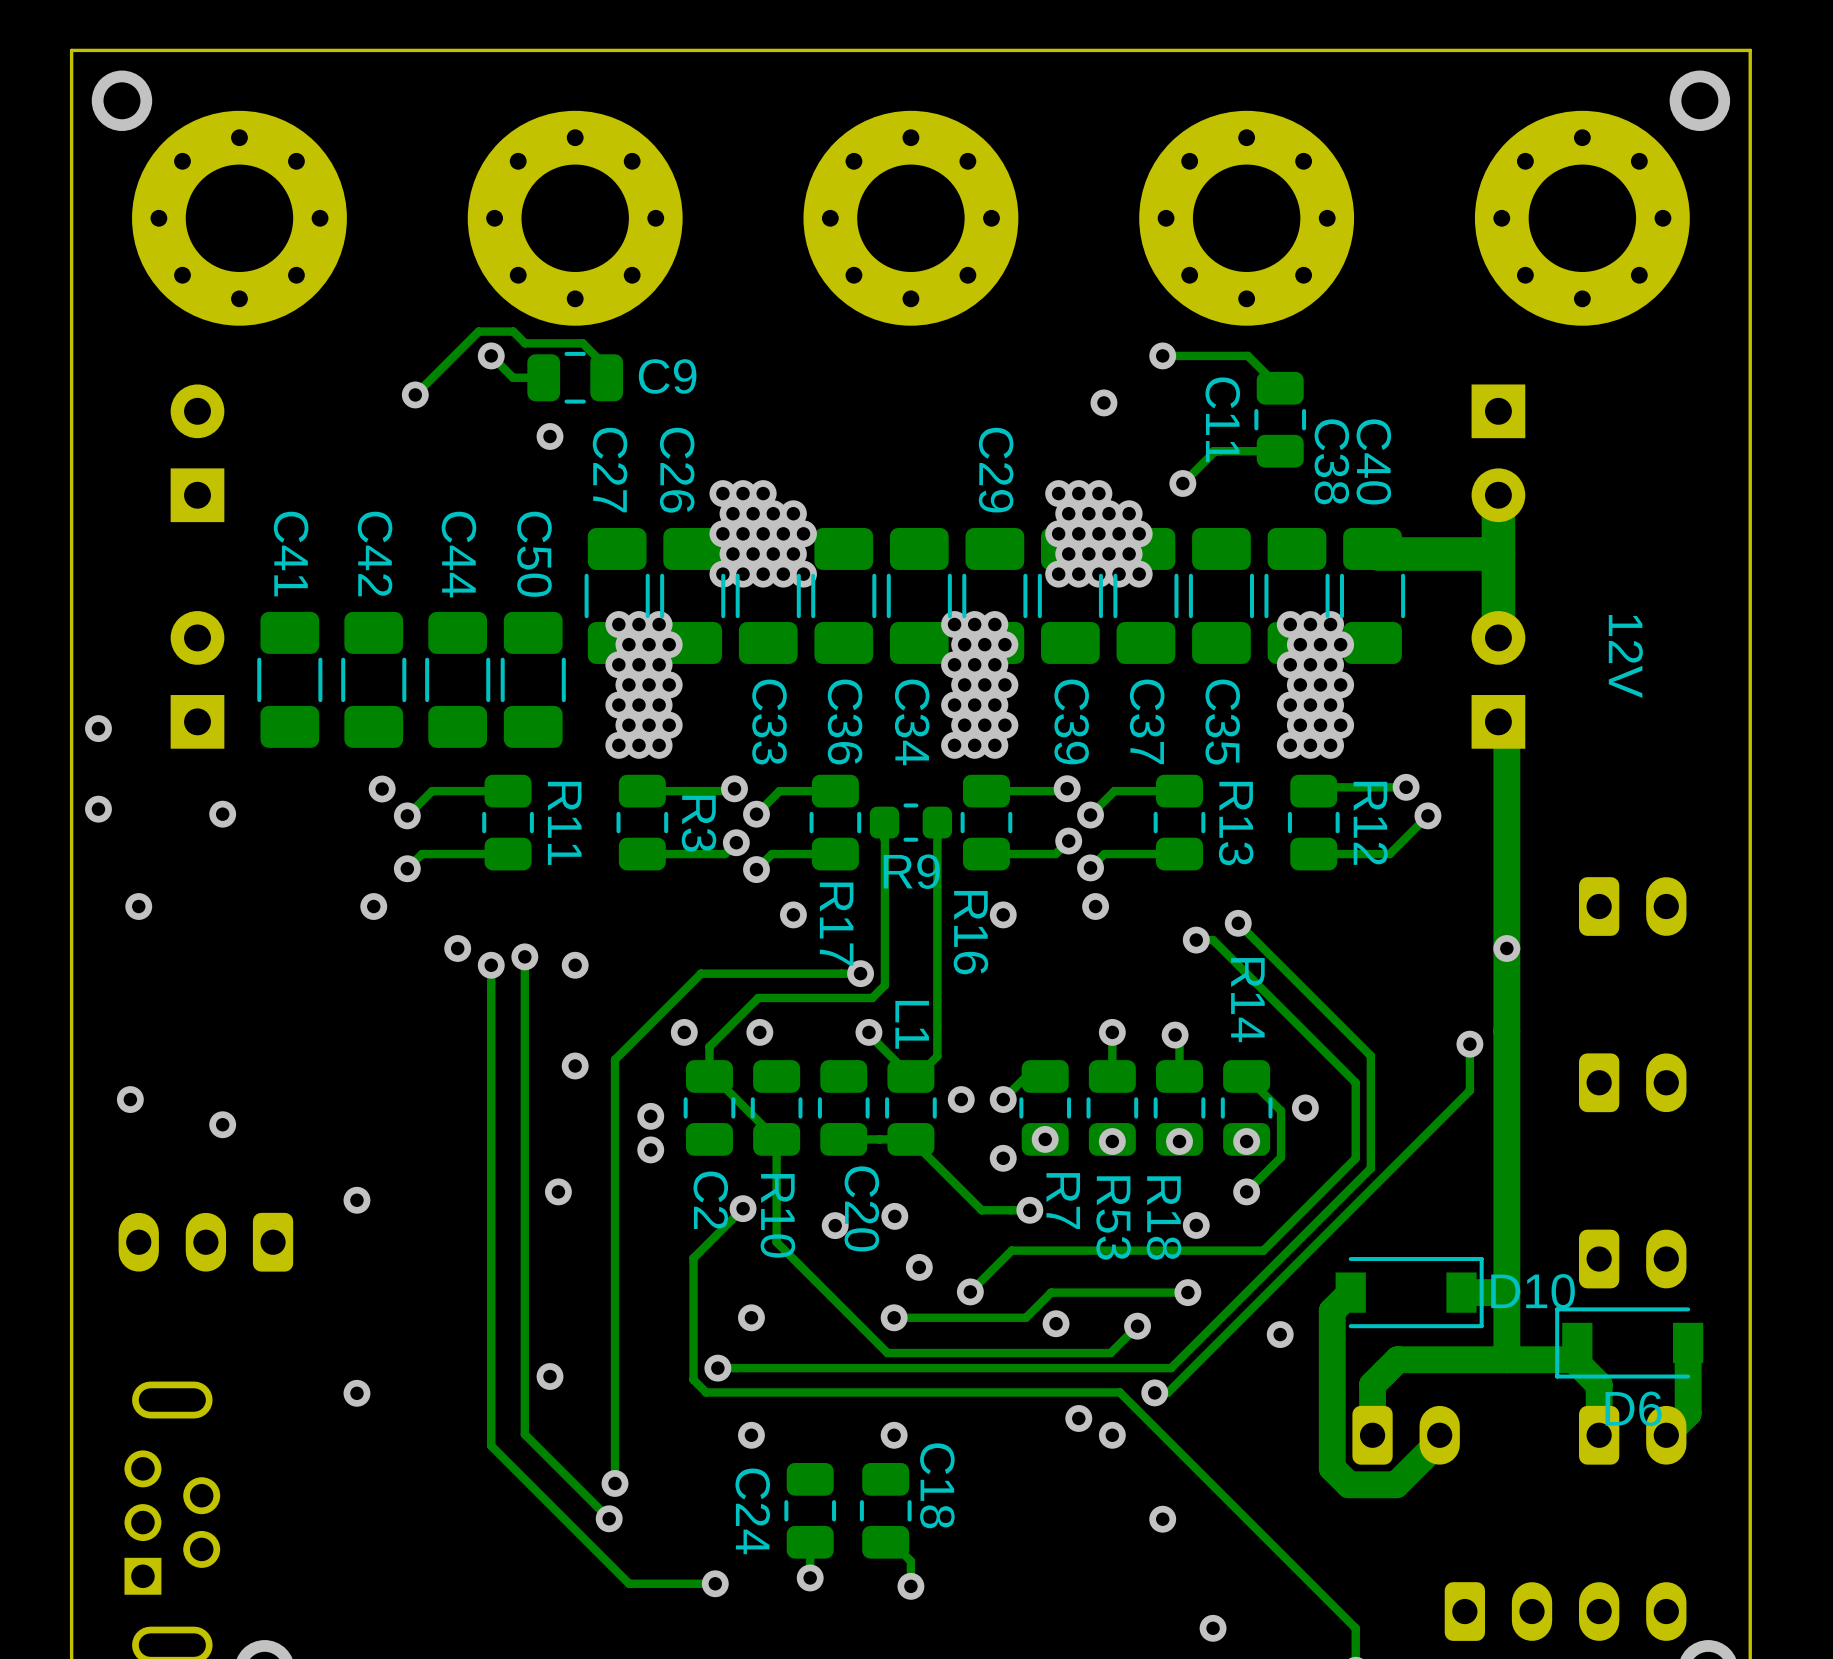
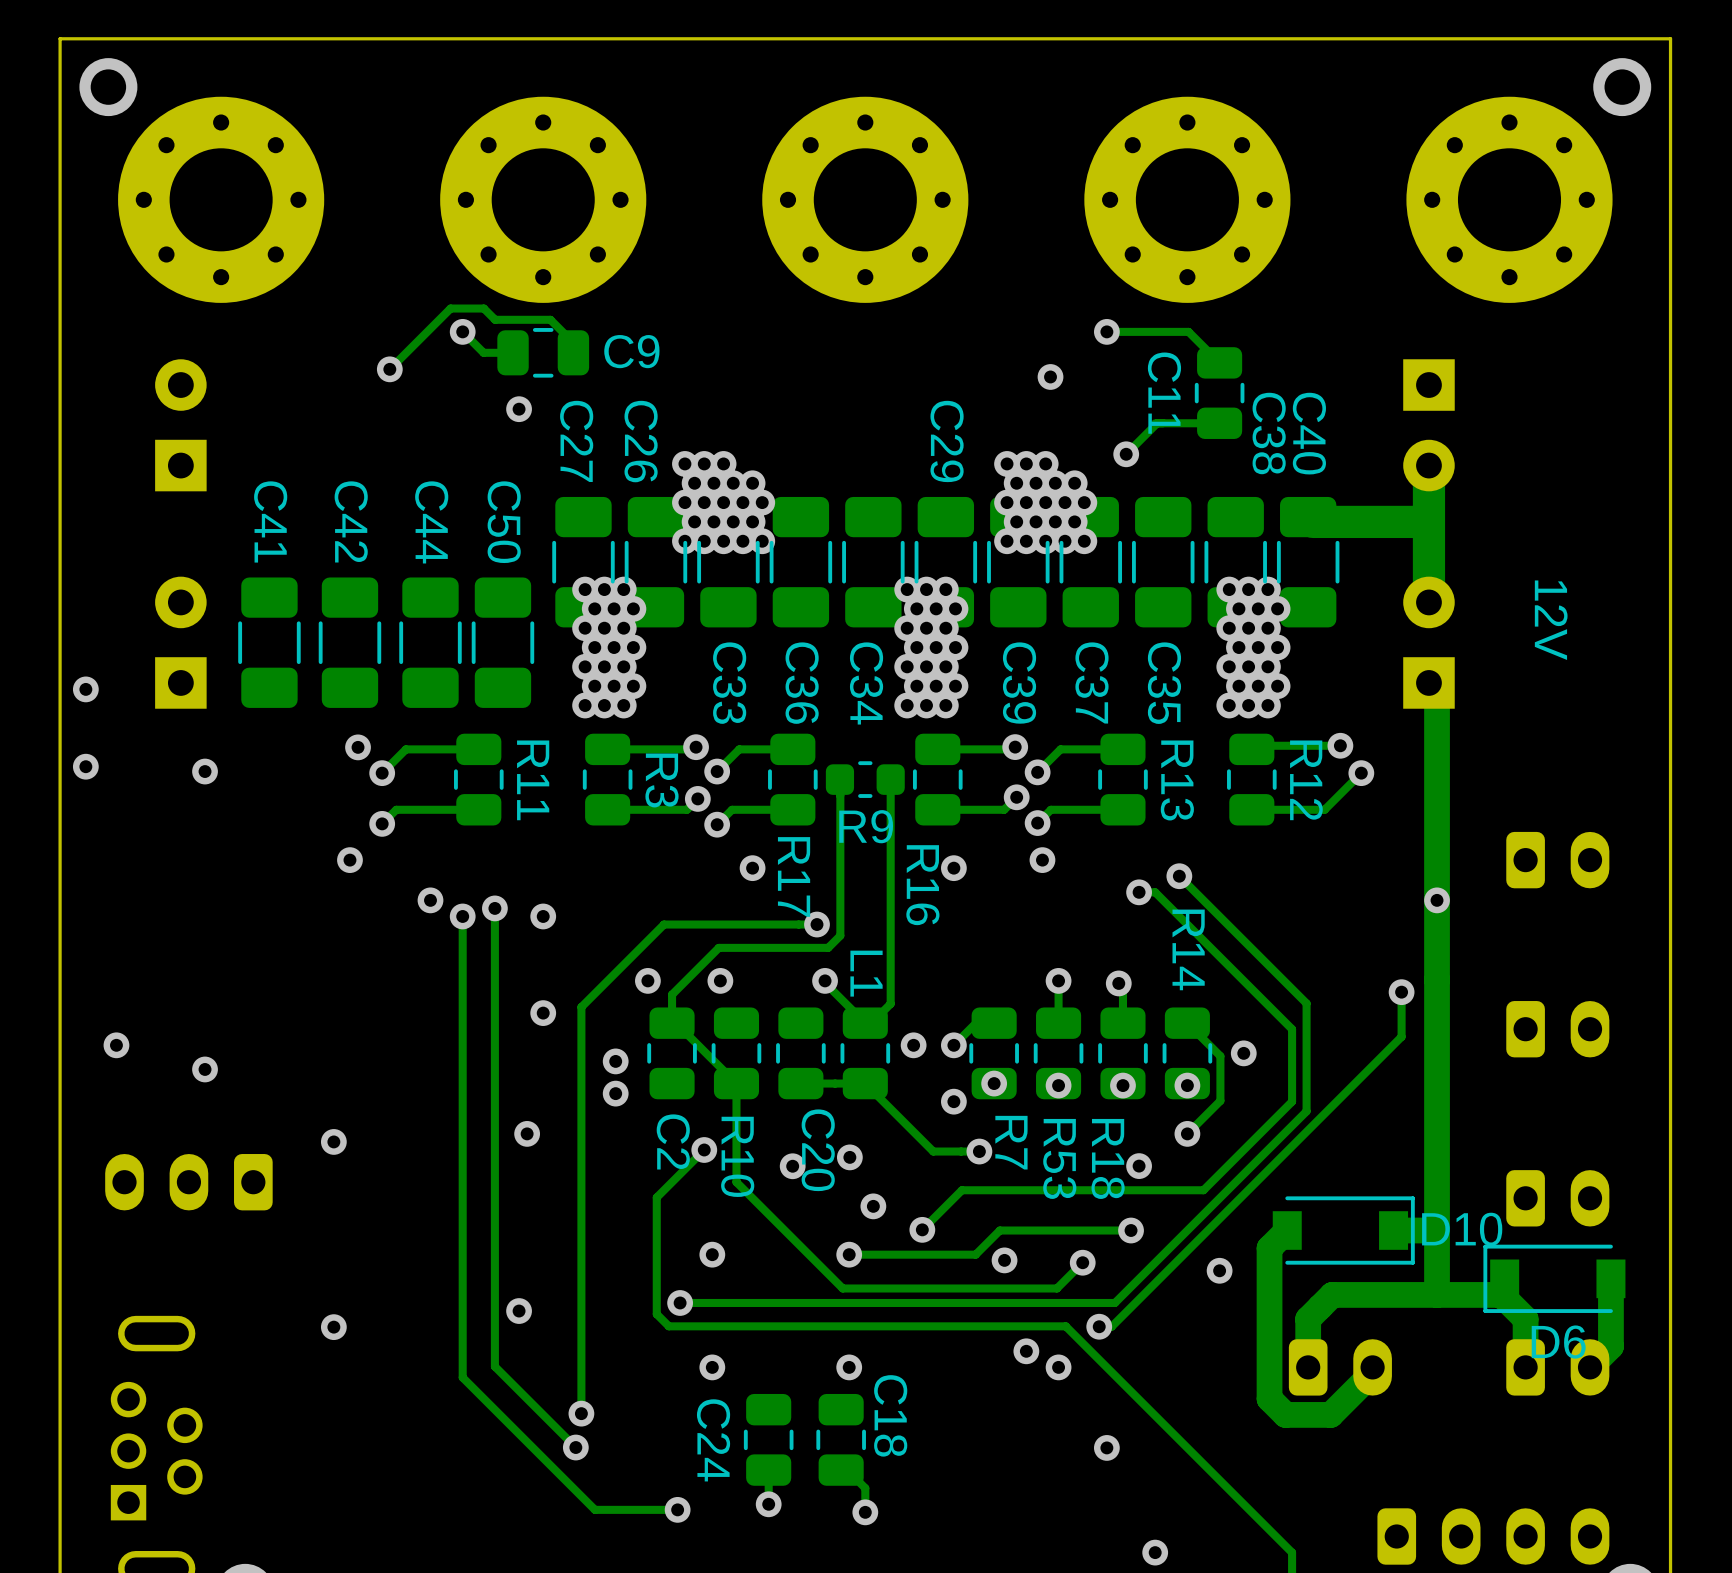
via: (138, 906) -> none

